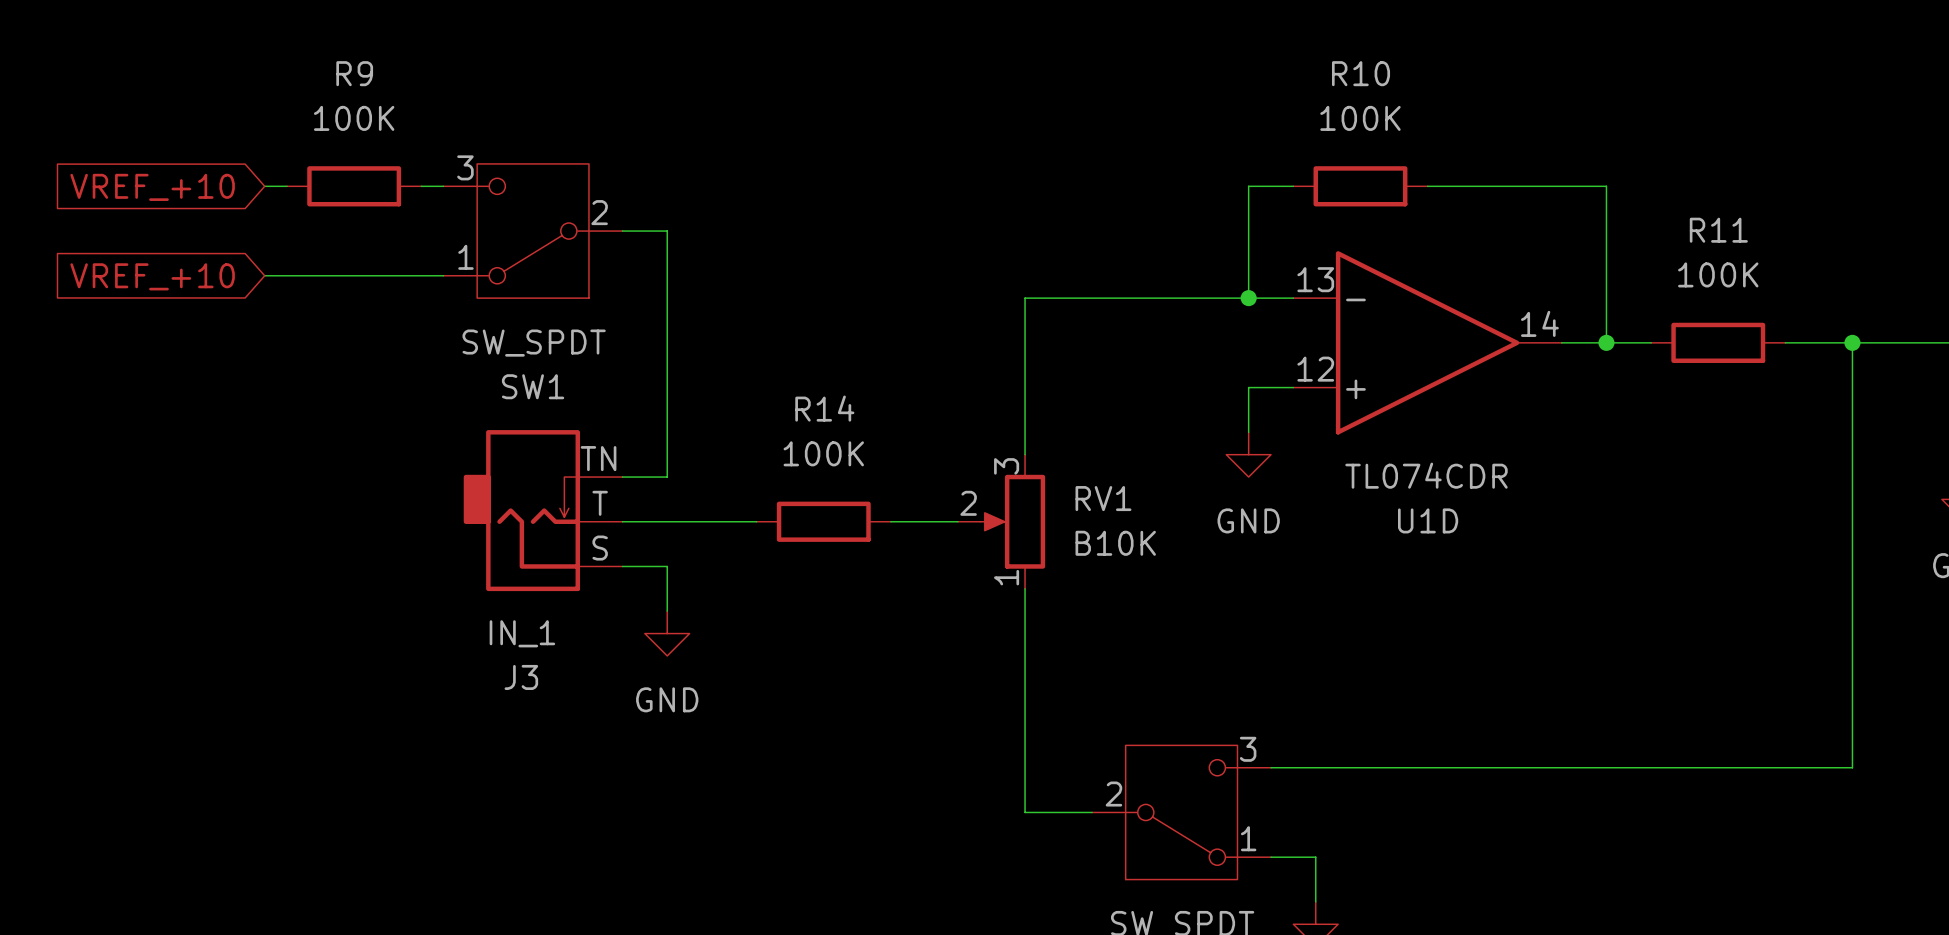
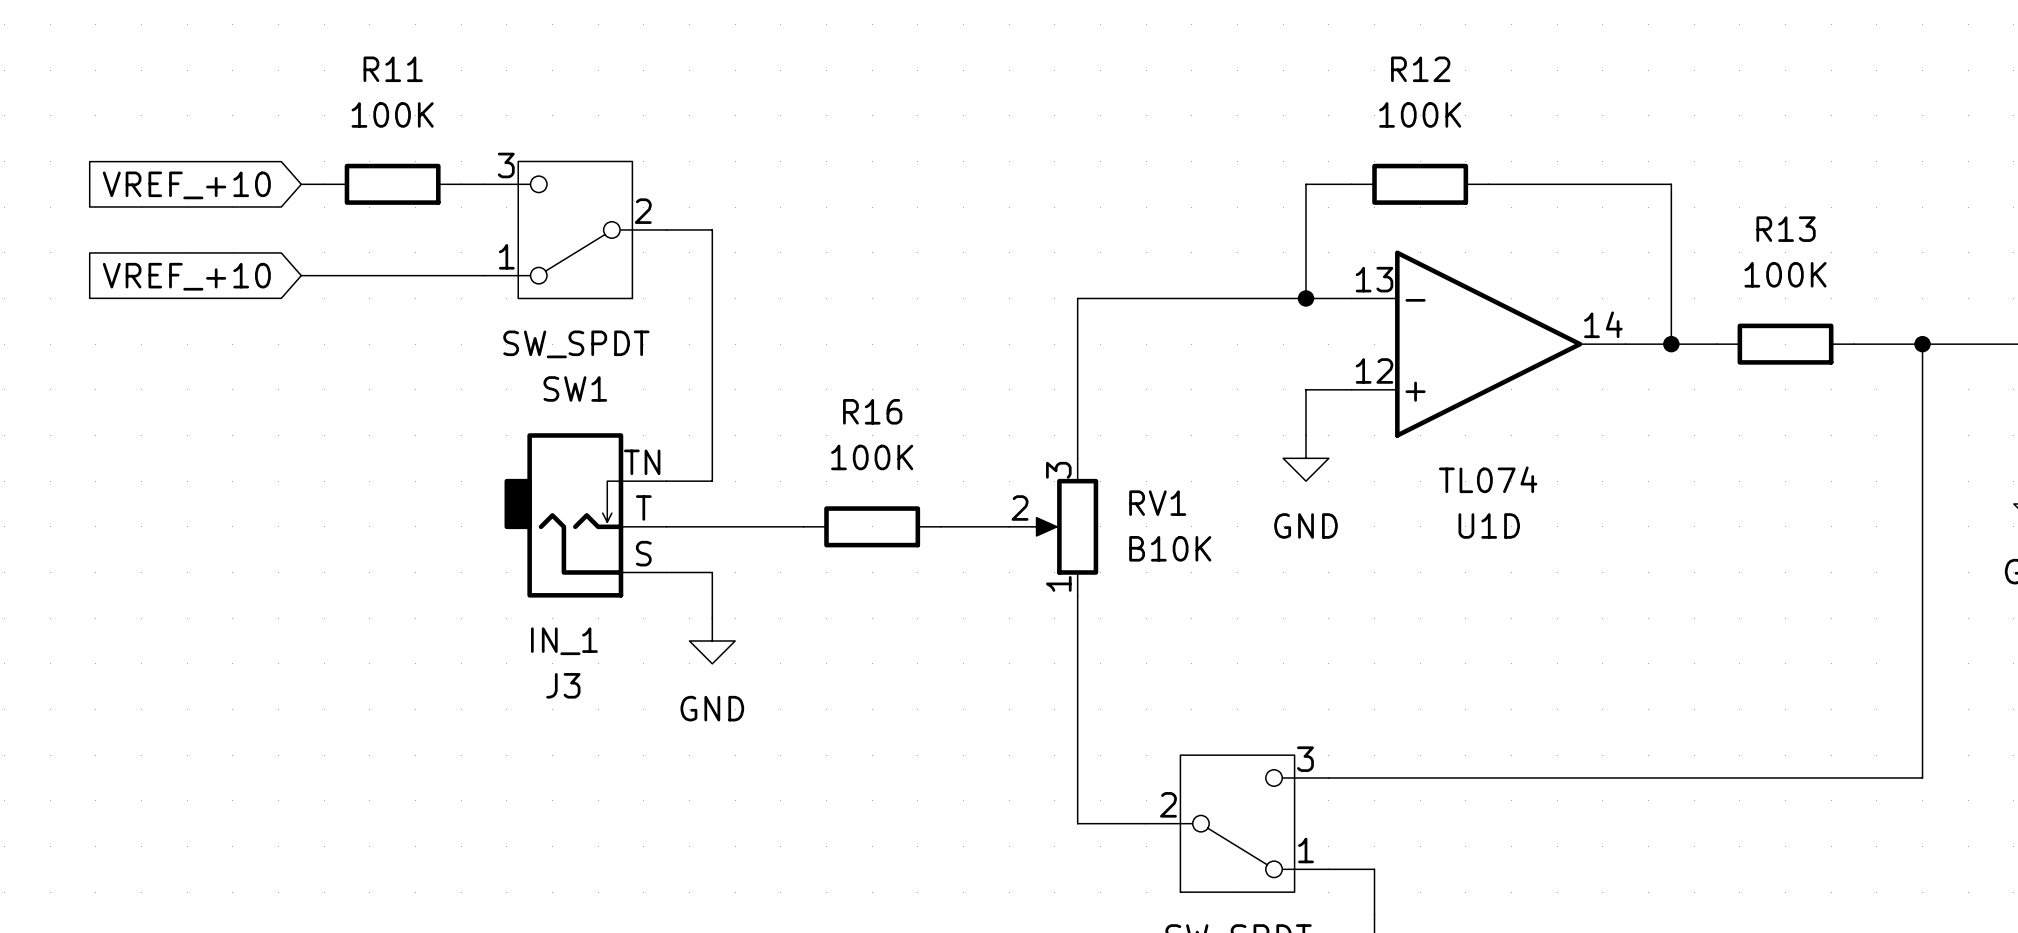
R9 name: R9 (354, 73) -> R11 (393, 69)
R10 name: R10 (1361, 73) -> R12 (1420, 69)
R11 name: R11 (1718, 230) -> R13 (1786, 229)
R14 name: R14 (824, 408) -> R16 (872, 411)
U1D value: TL074CDR (1426, 475) -> TL074 (1488, 479)

